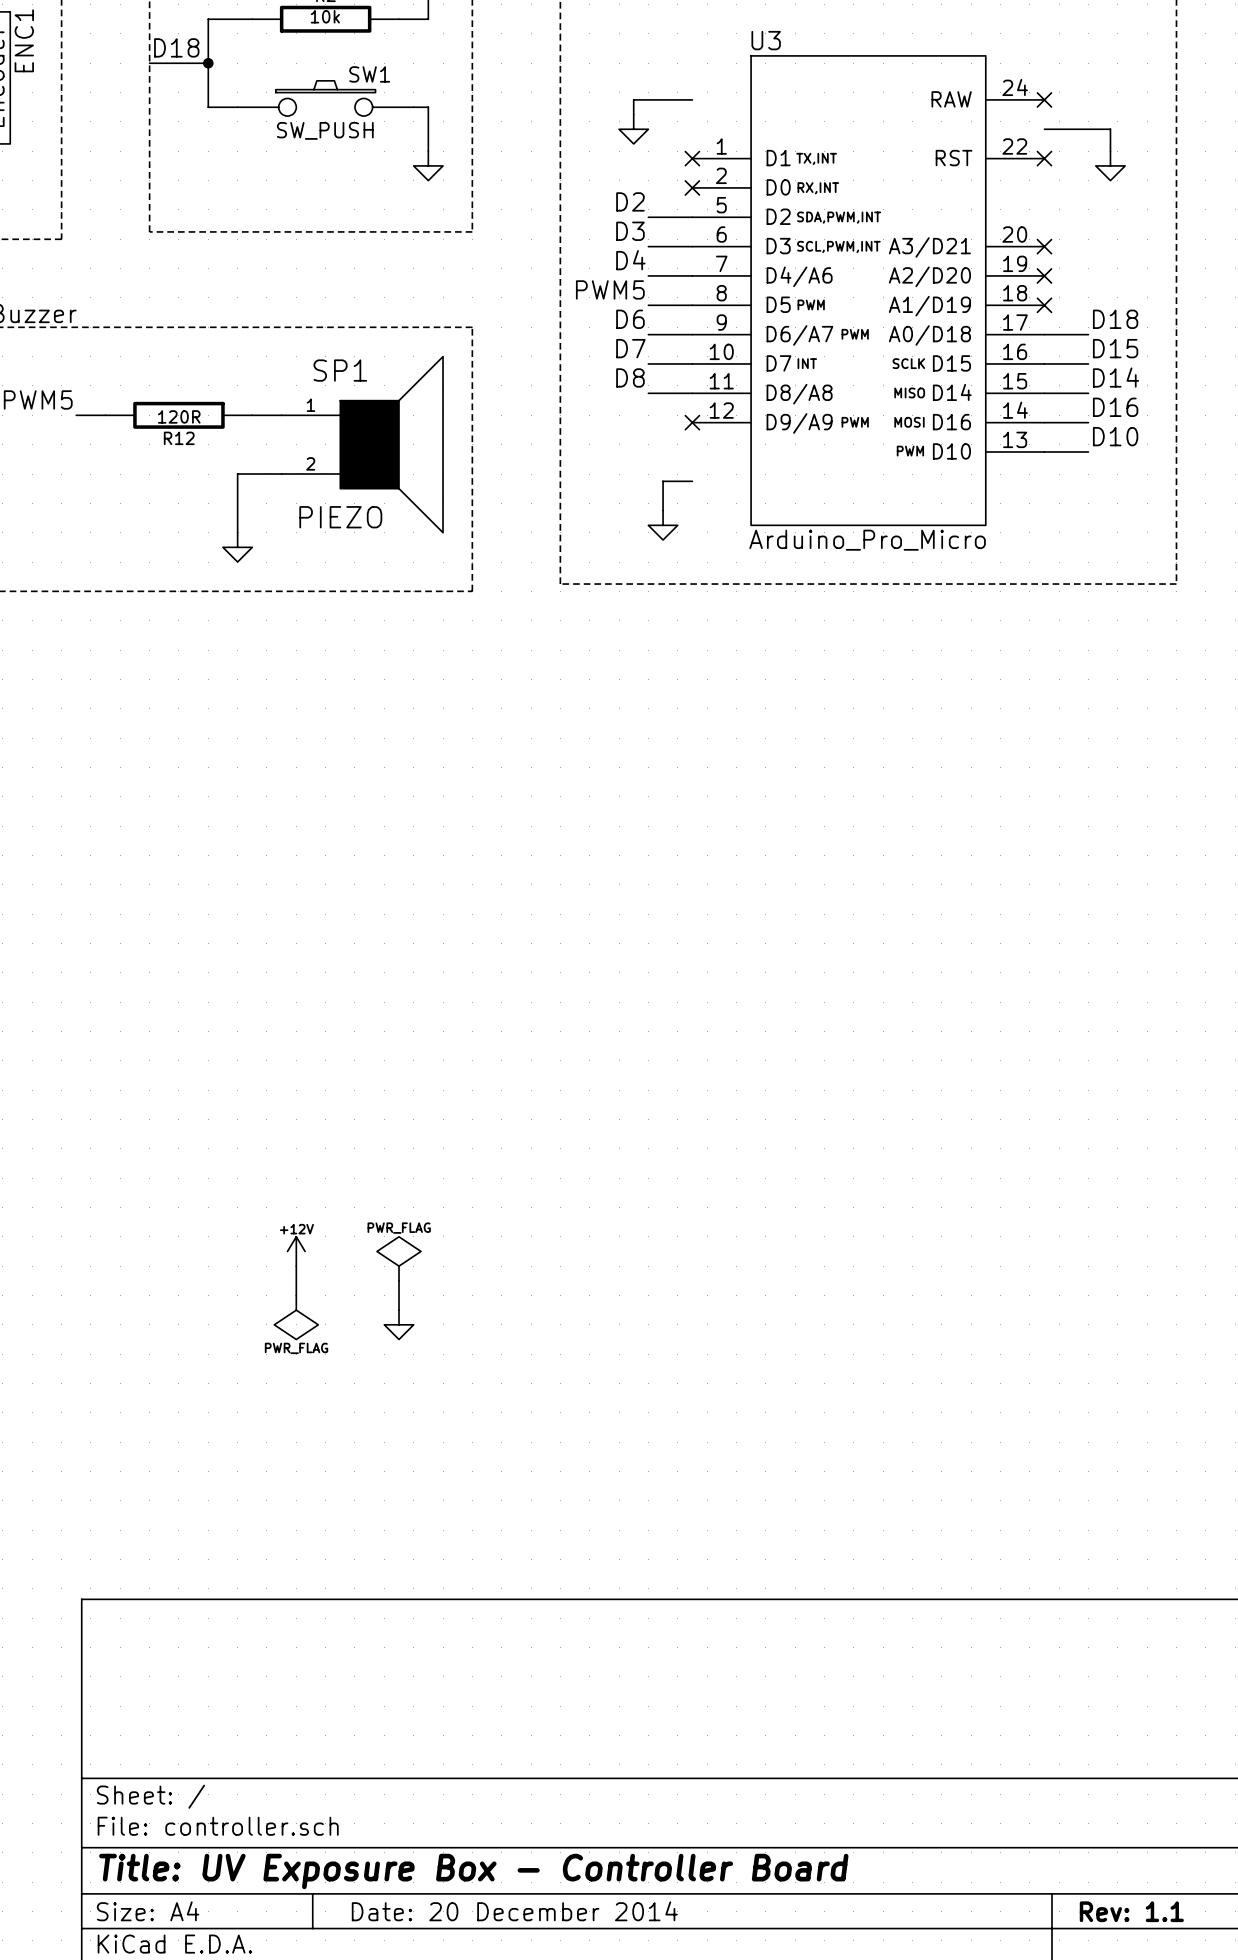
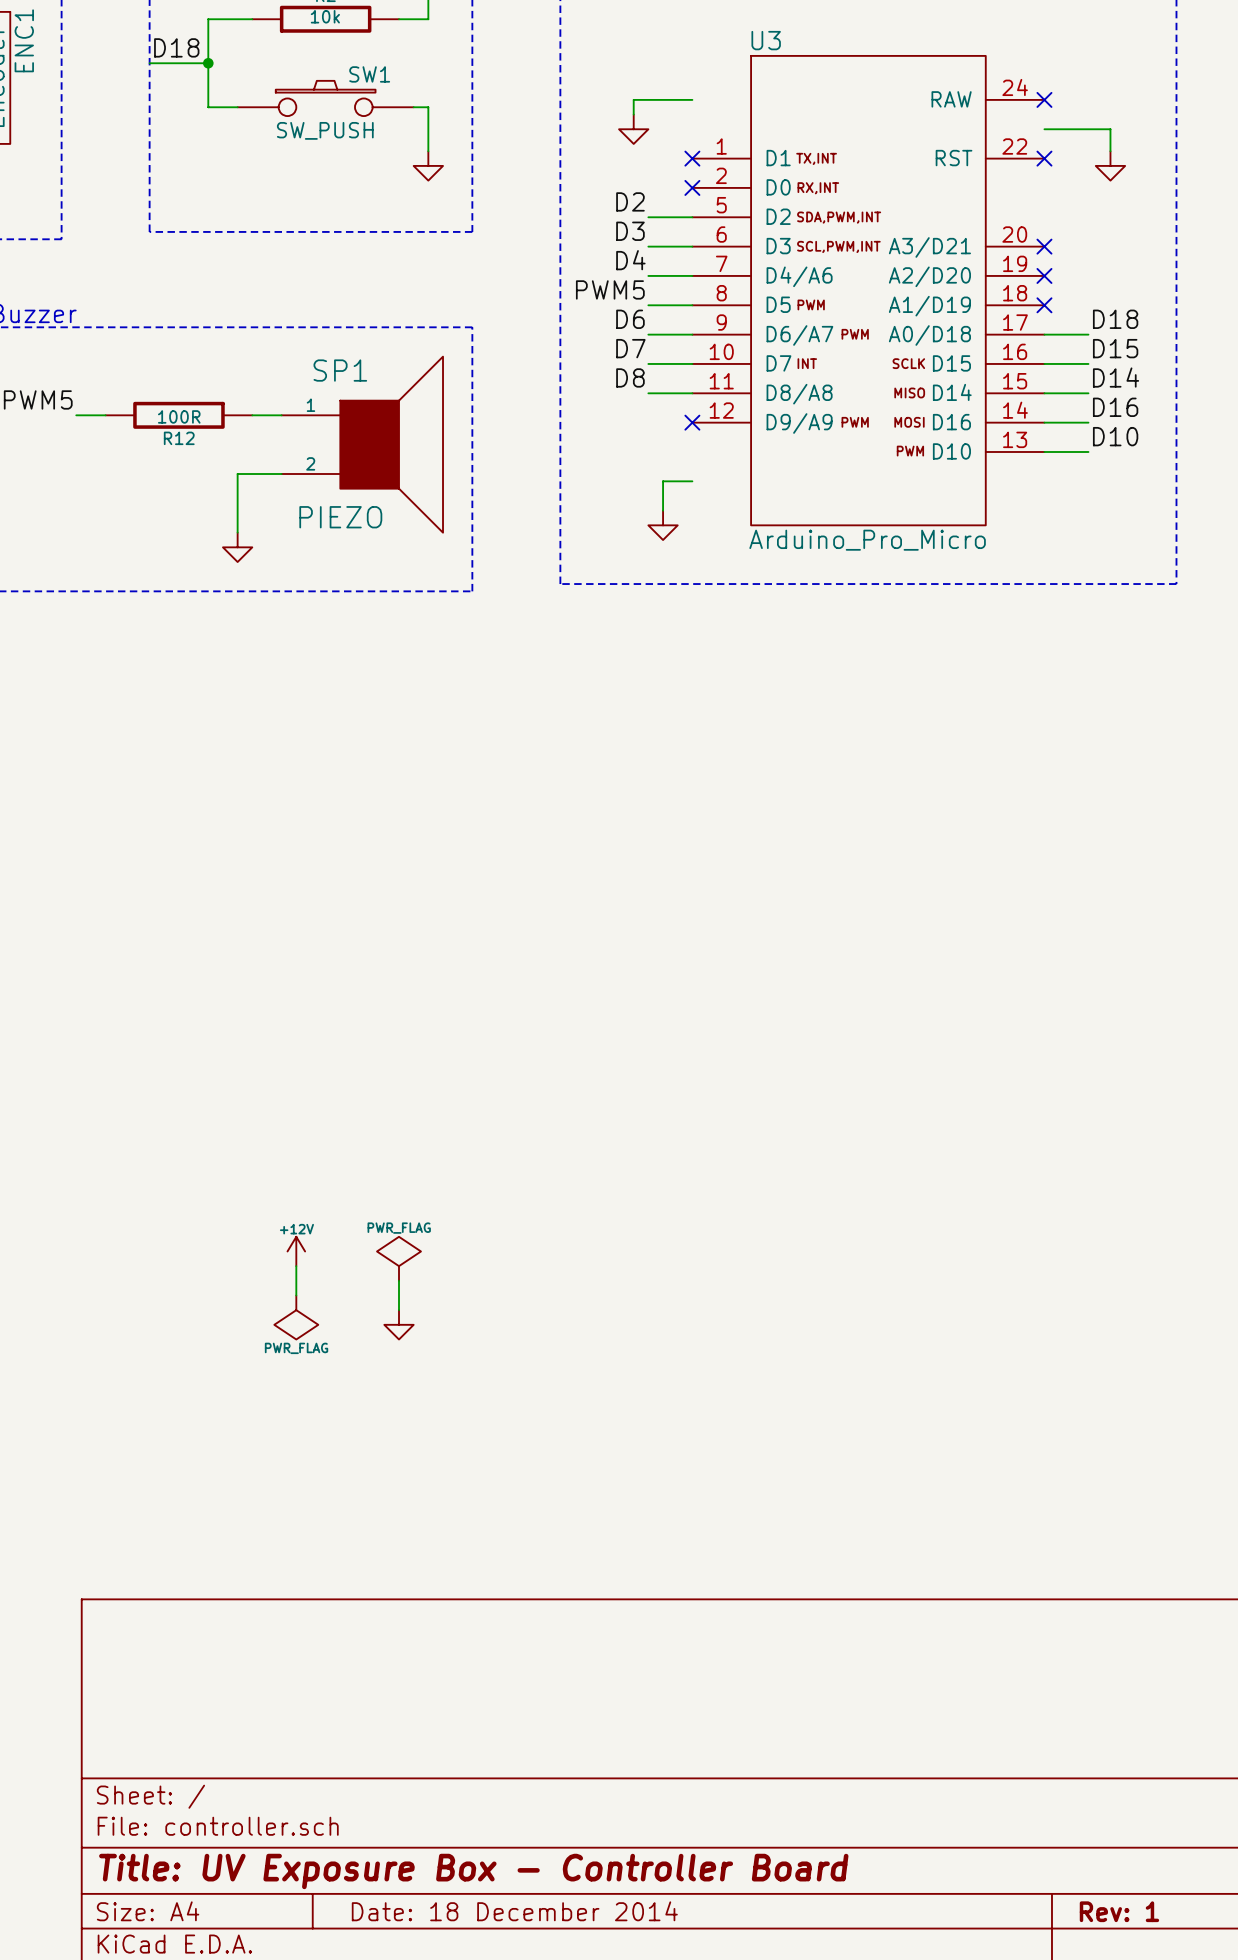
R12 value: 120R (179, 416) -> 100R (179, 416)
title block: Date: 20 December 2014 (514, 1911) -> Date: 18 December 2014 (514, 1911)
title block: Rev: 1.1 (1131, 1911) -> Rev: 1 (1119, 1911)

